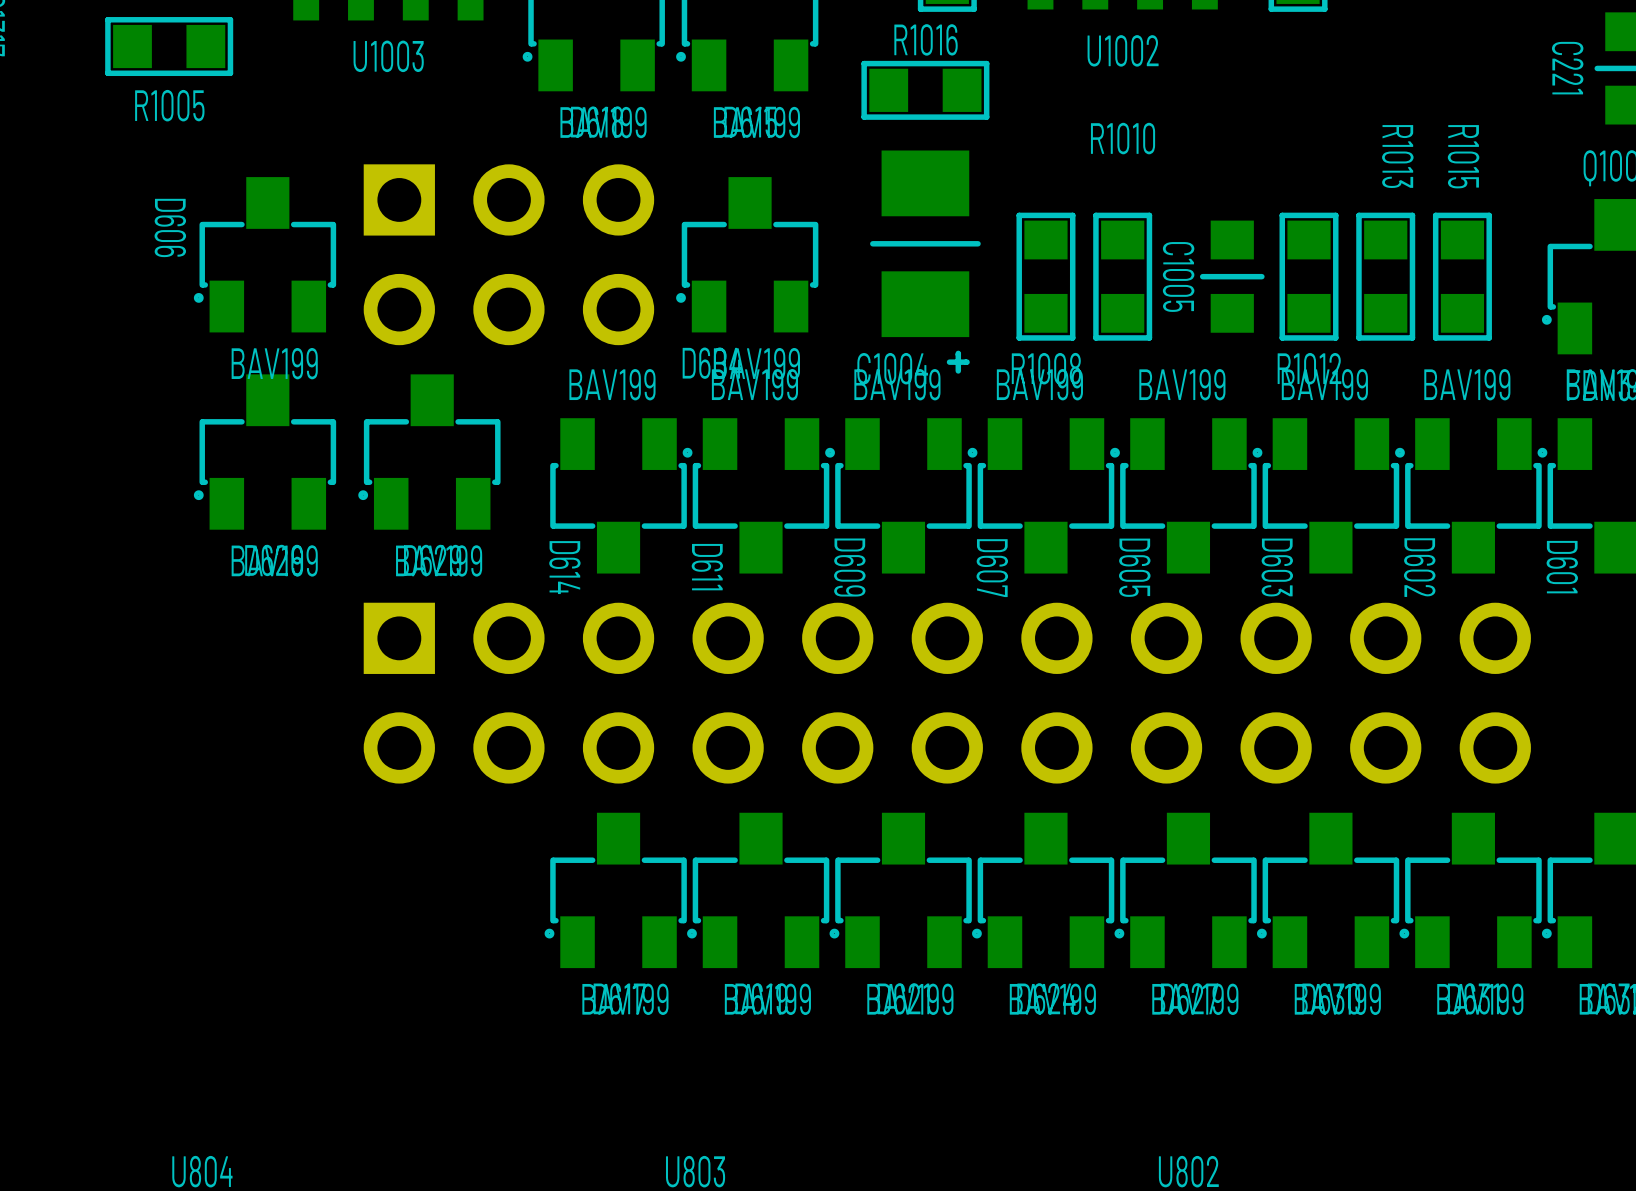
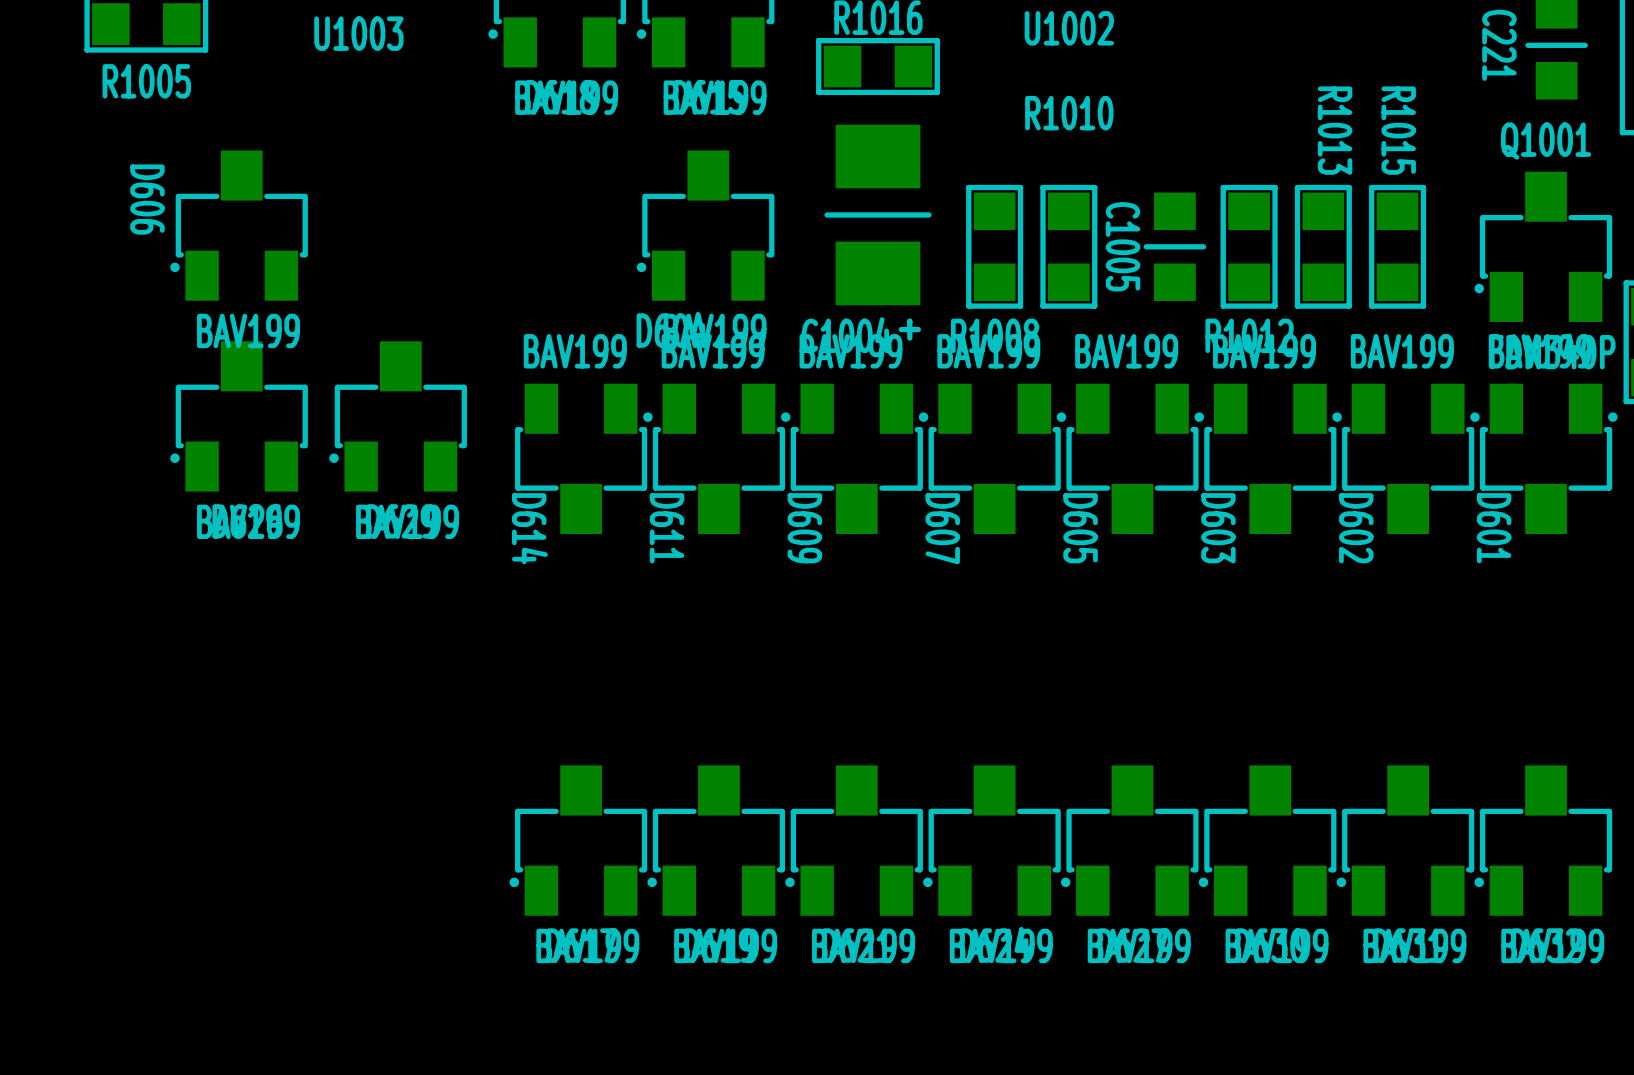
part: (508, 254) -> none
part: (947, 693) -> none

